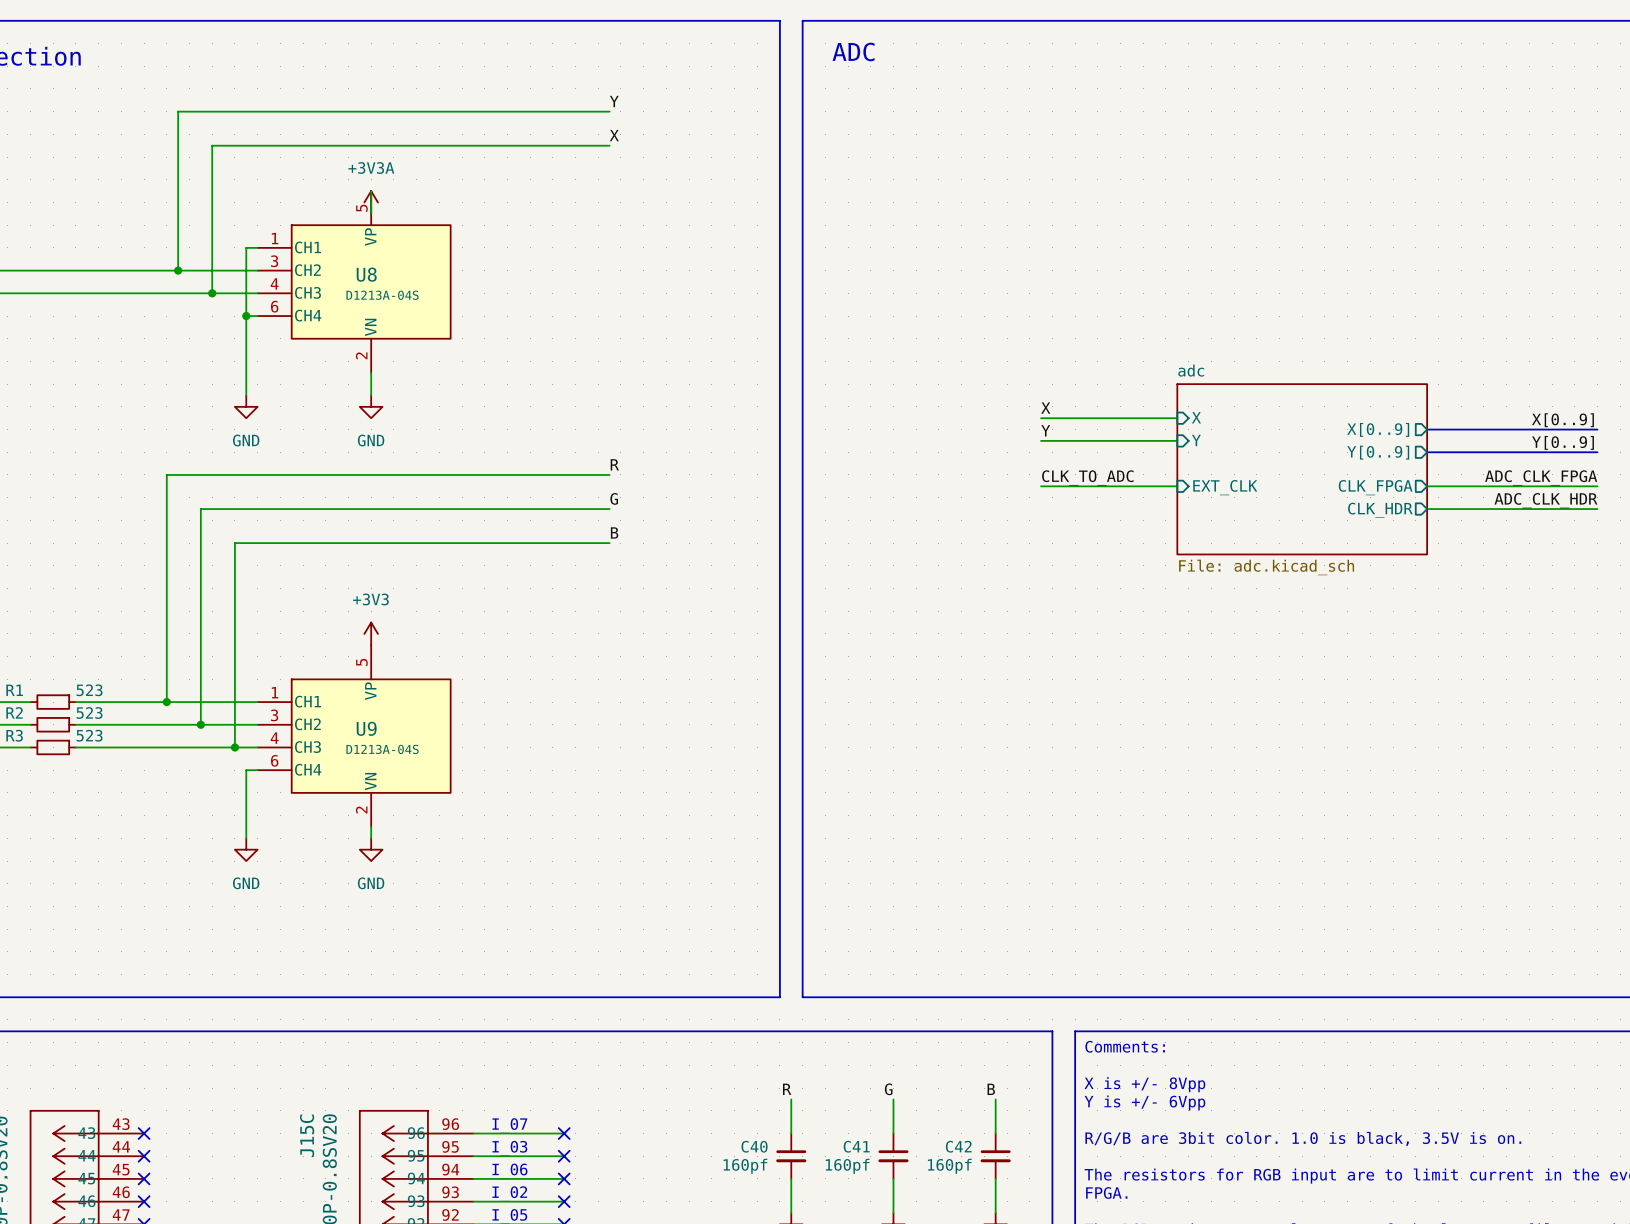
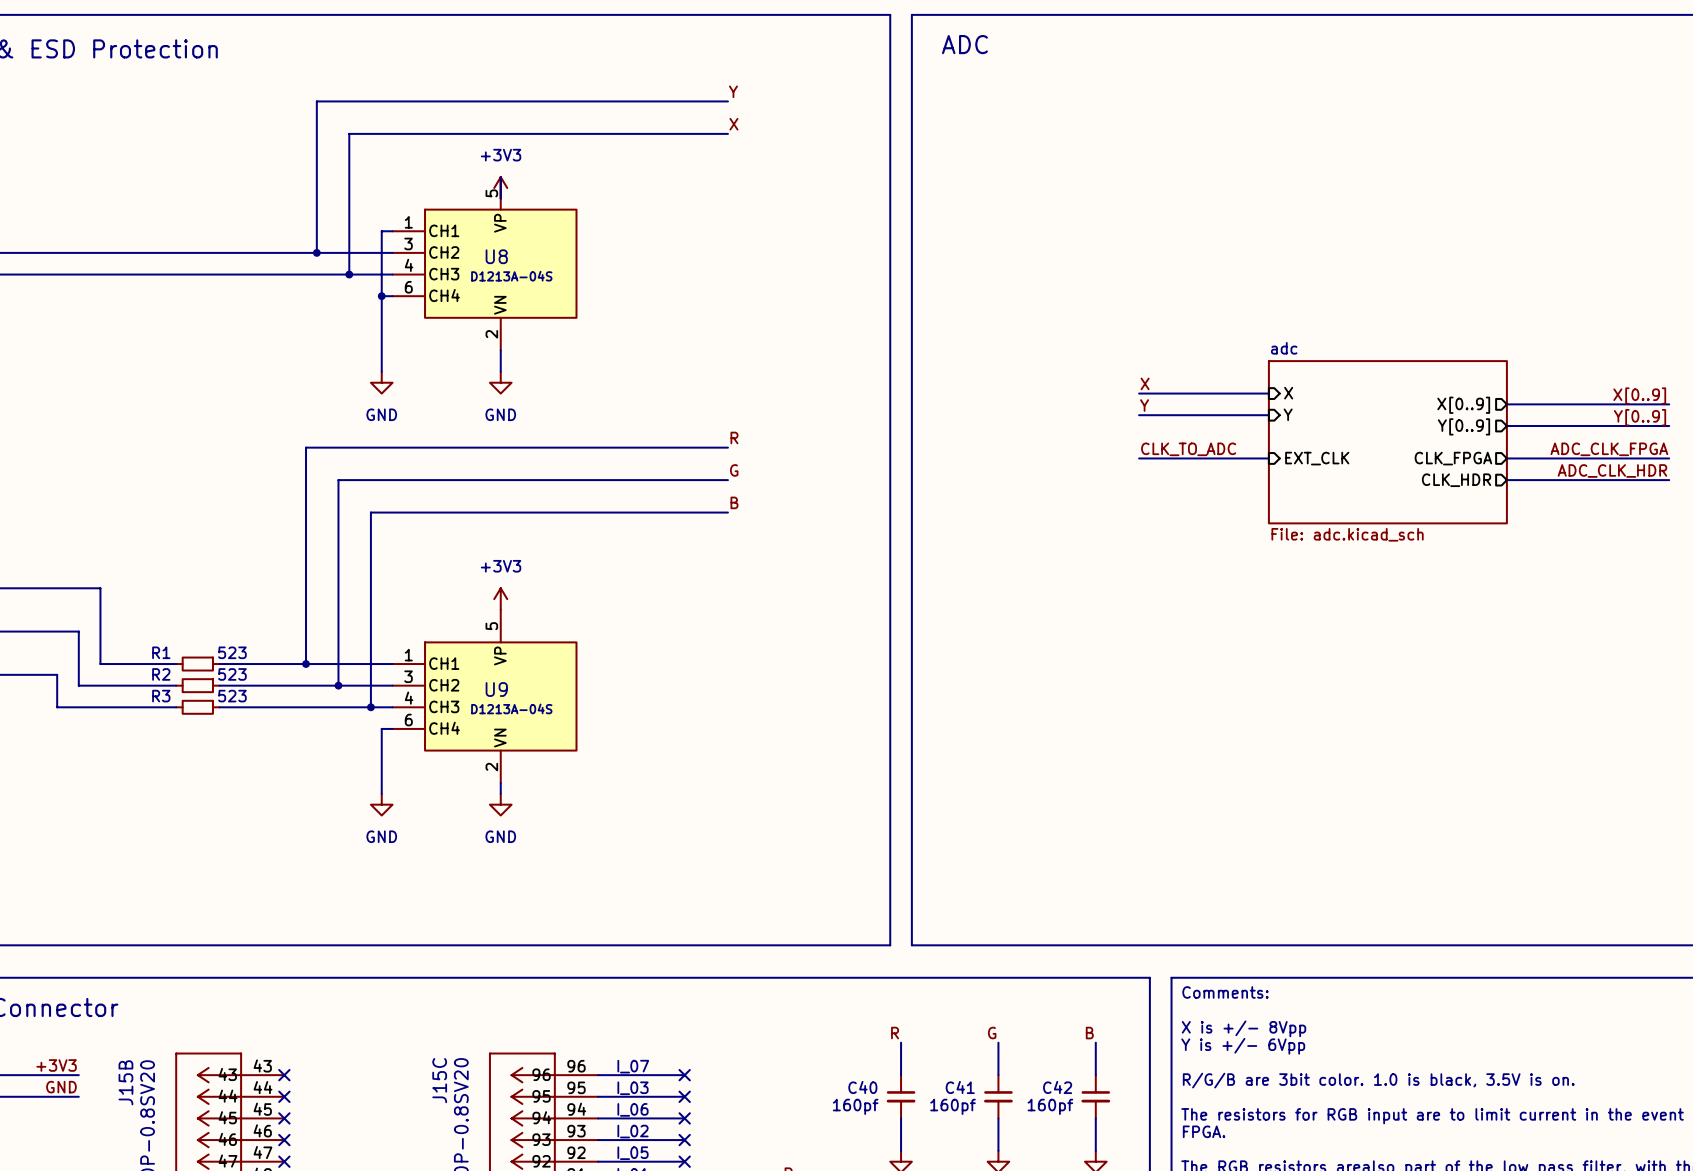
power symbol: +3V3A (371, 202) -> +3V3 (500, 187)

